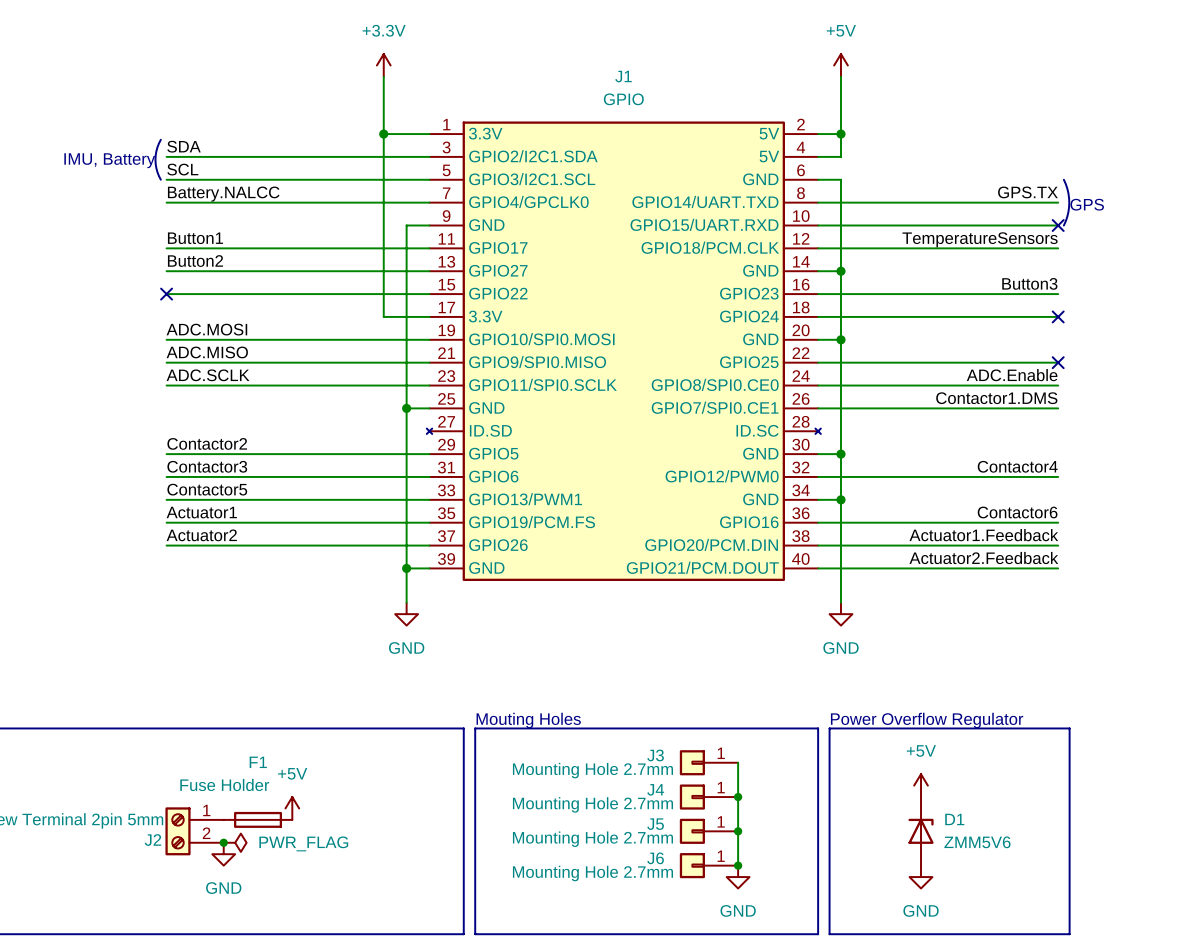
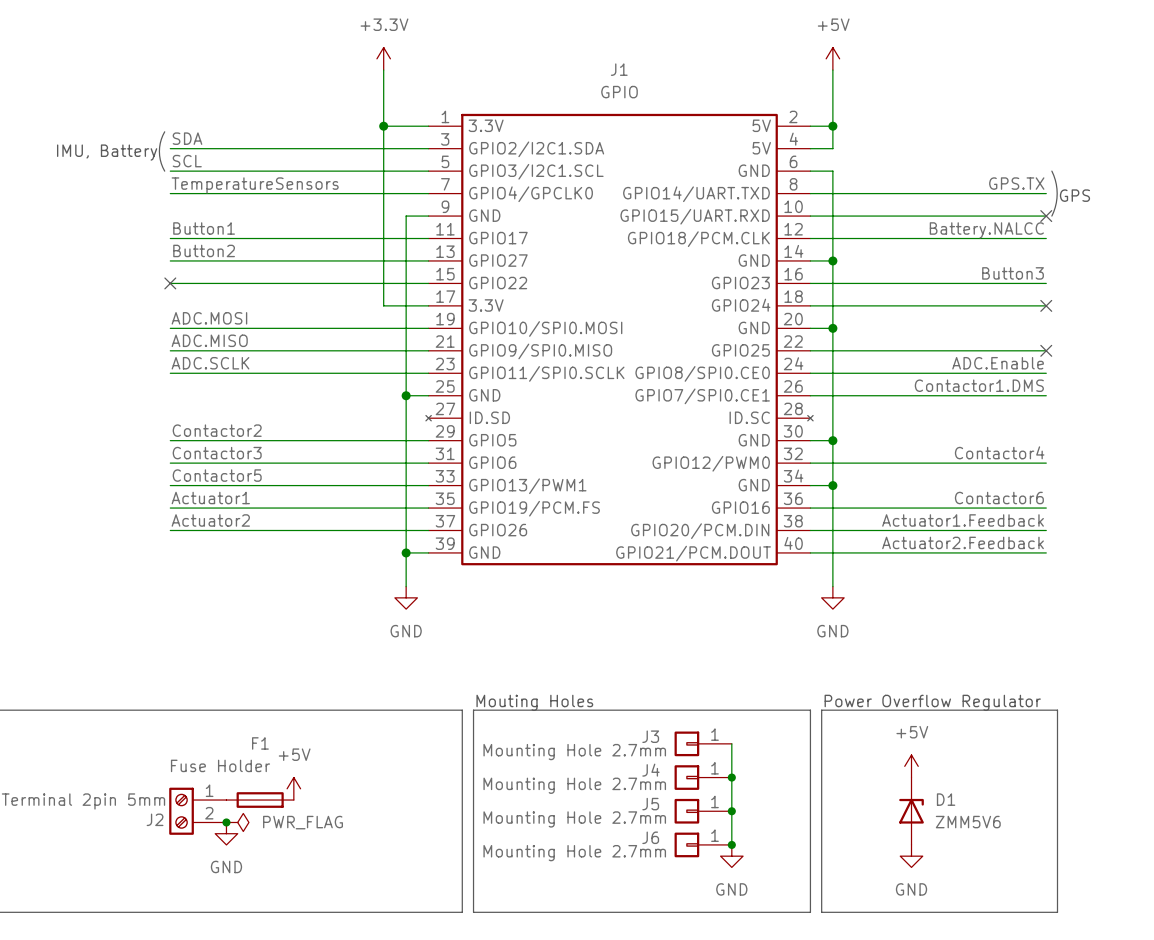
label: Battery.NALCC (223, 194) -> TemperatureSensors (255, 185)
label: TemperatureSensors (980, 239) -> Battery.NALCC (986, 230)

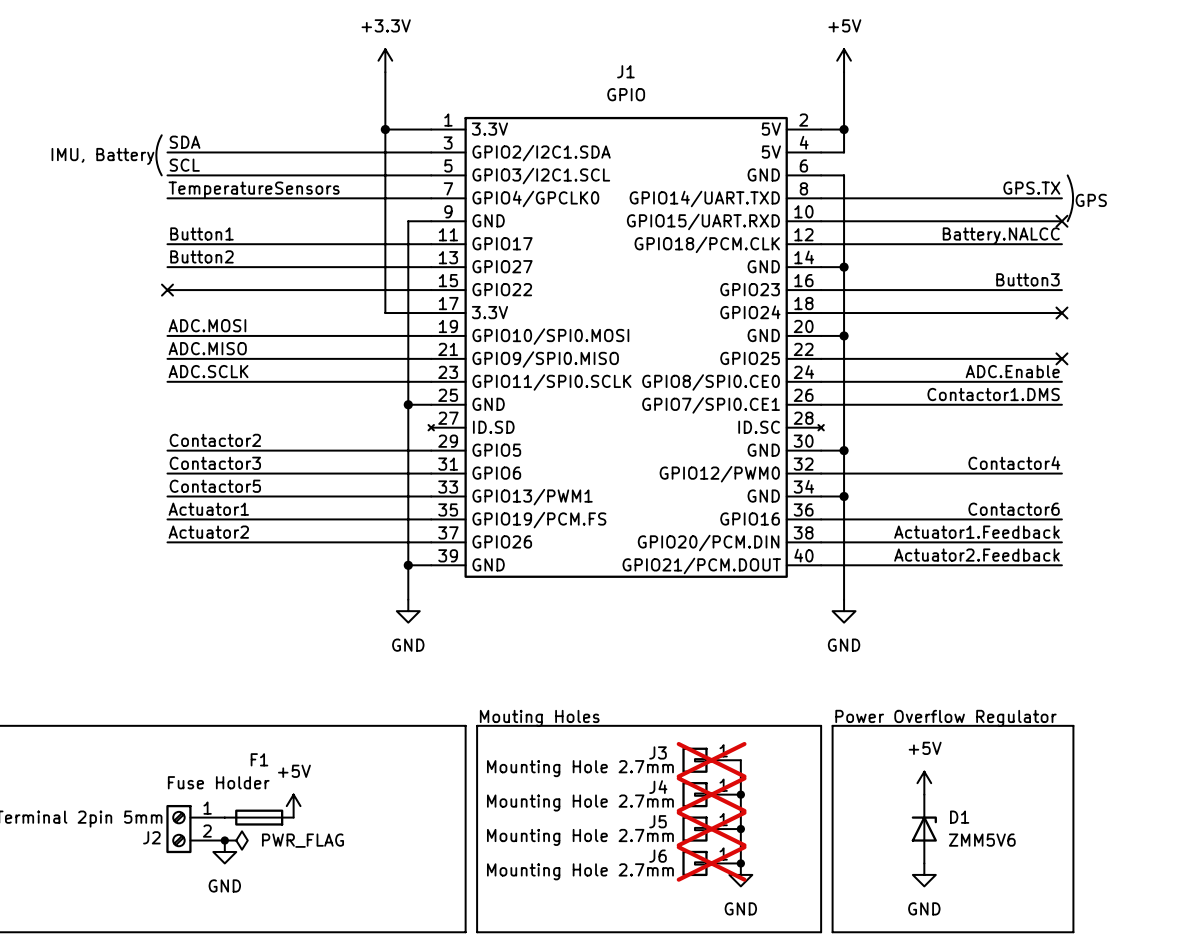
J3 do-not-place cross: none -> (711, 760)
J4 do-not-place cross: none -> (711, 794)
J5 do-not-place cross: none -> (711, 829)
J6 do-not-place cross: none -> (711, 863)

